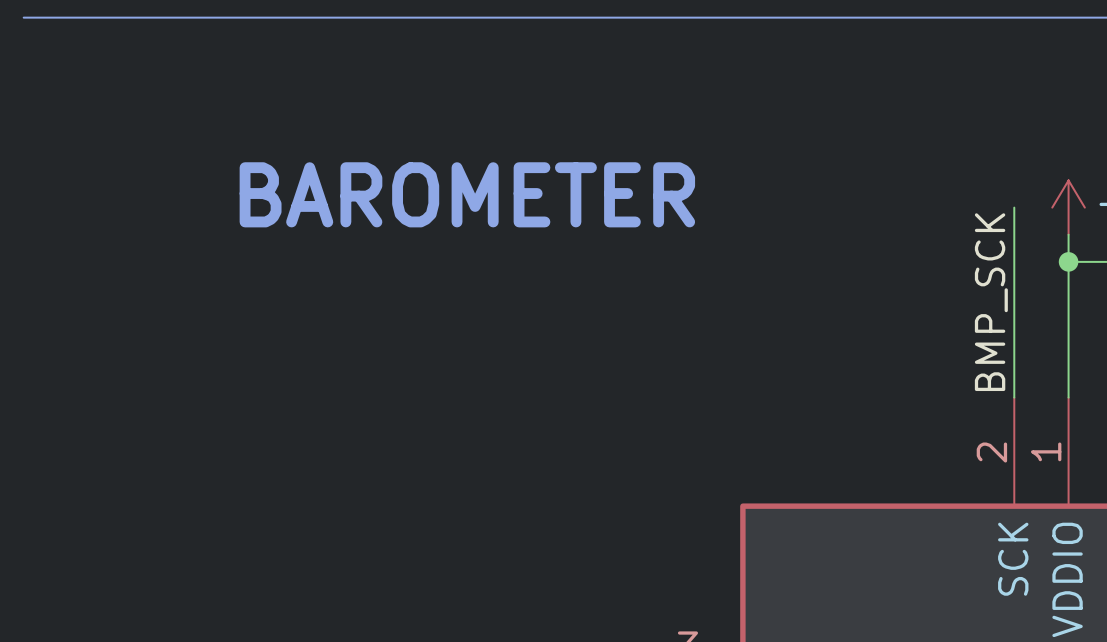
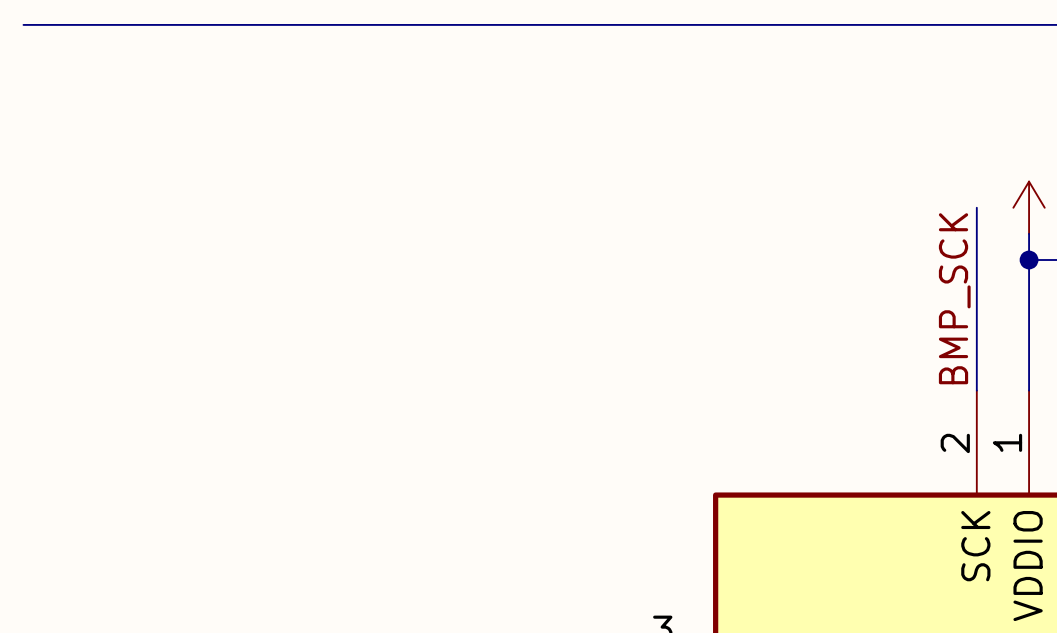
text: BAROMETER (467, 194) -> none

